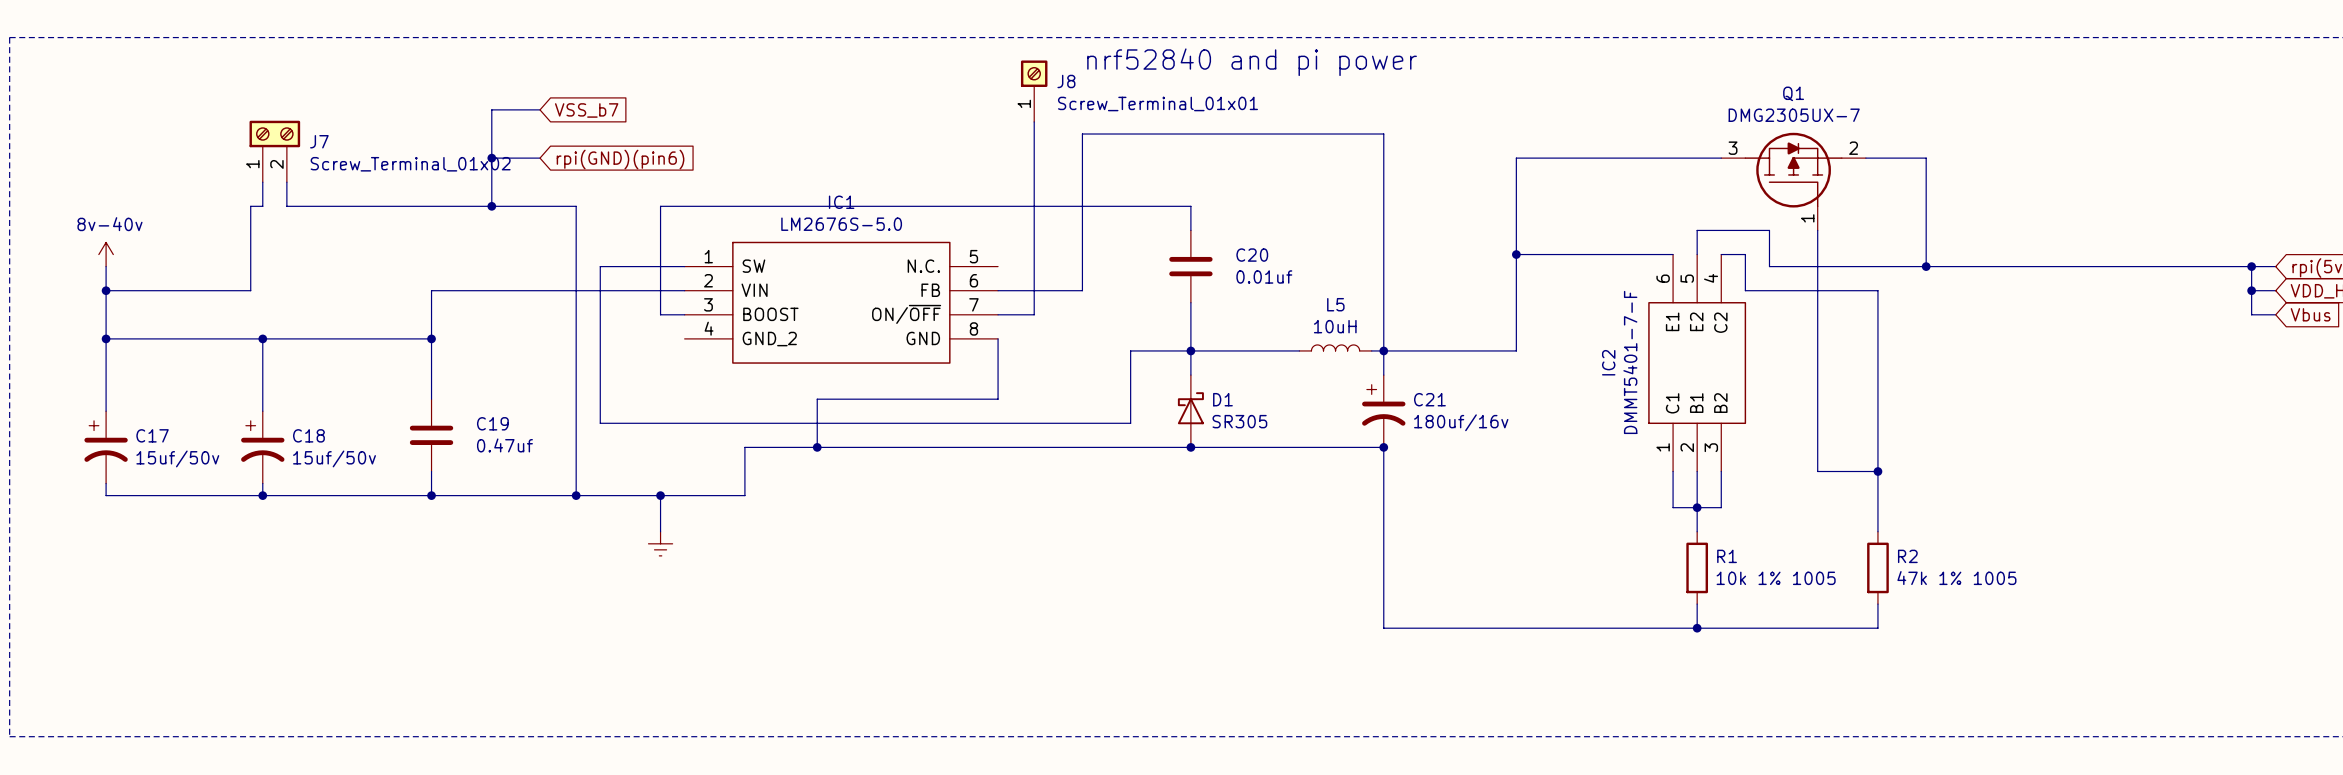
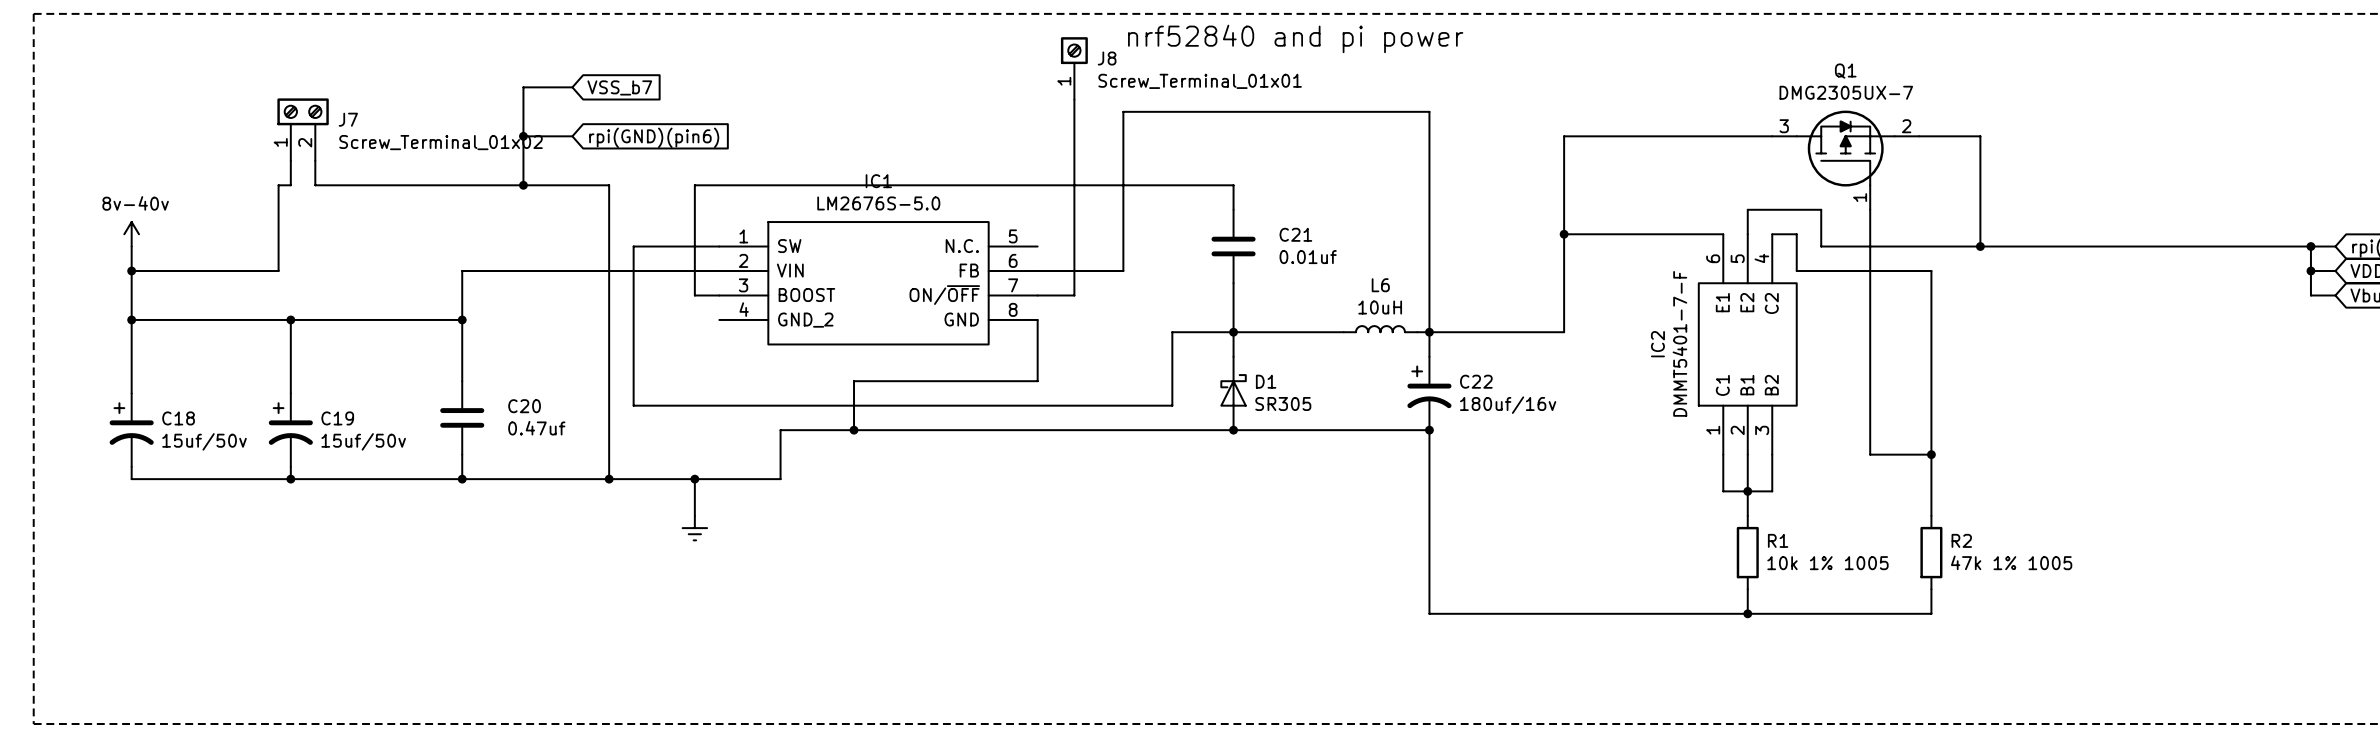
C20 name: C20 (1252, 255) -> C21 (1295, 234)
L5 name: L5 (1335, 304) -> L6 (1380, 285)
C21 name: C21 (1429, 399) -> C22 (1476, 381)
C19 name: C19 (492, 423) -> C20 (524, 406)
C17 name: C17 (152, 435) -> C18 (178, 418)
C18 name: C18 (308, 435) -> C19 (337, 418)

